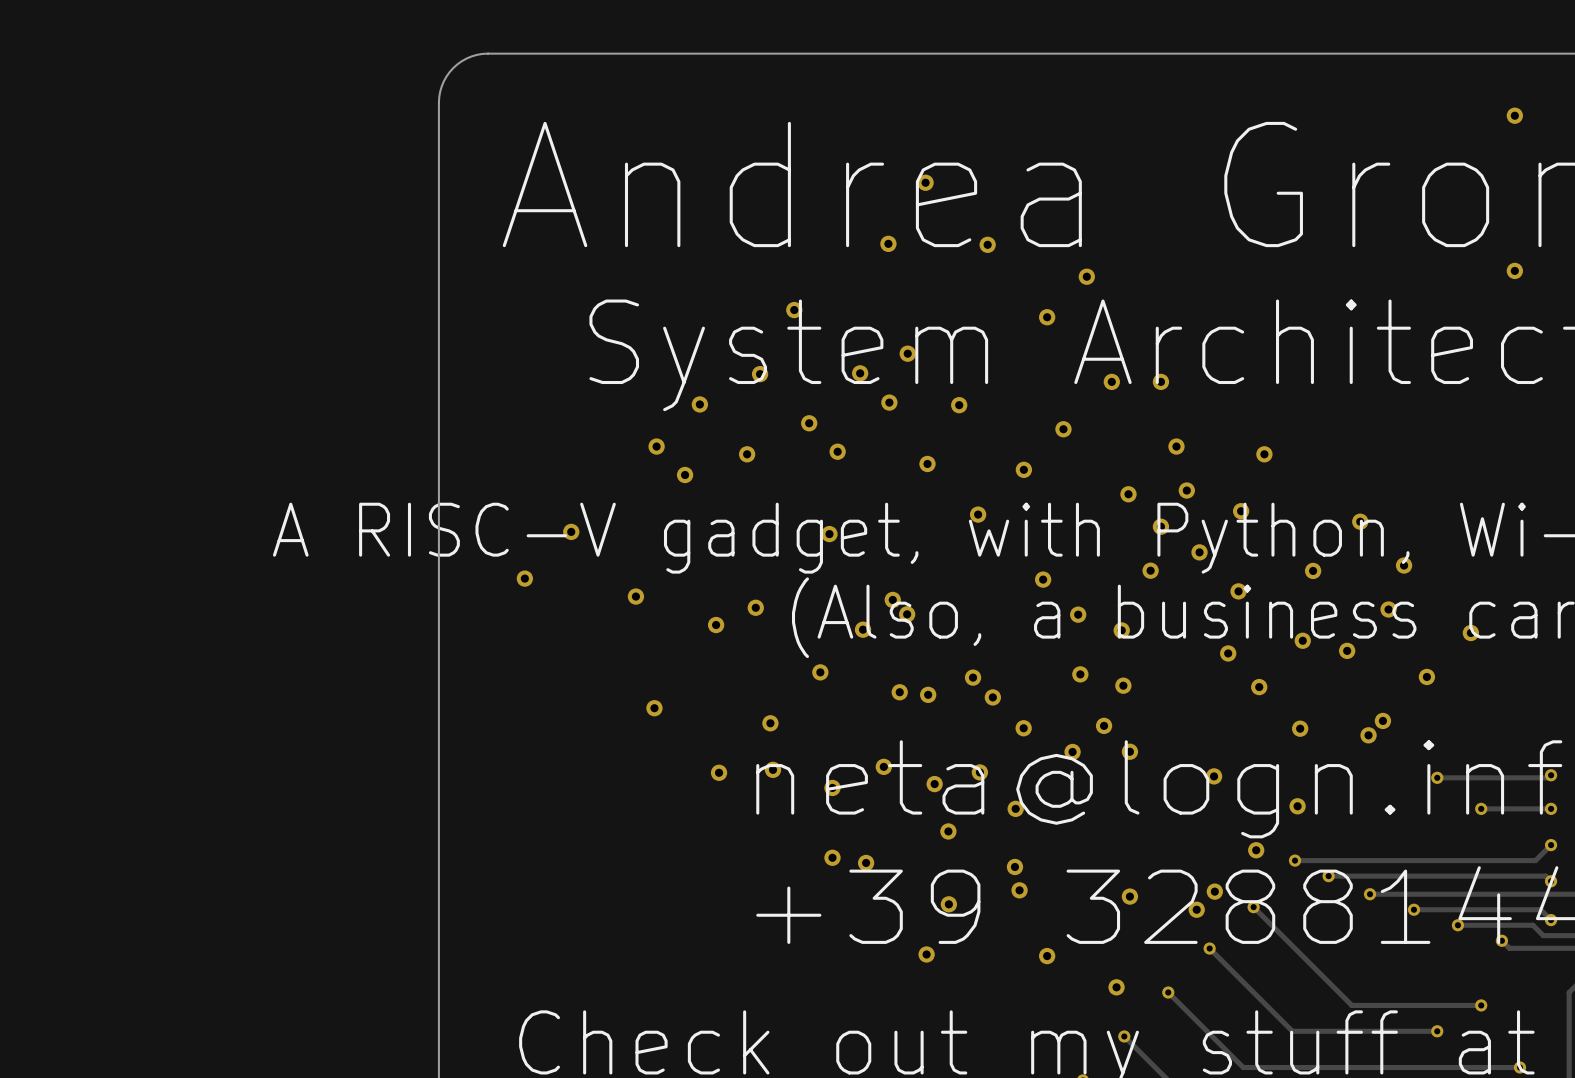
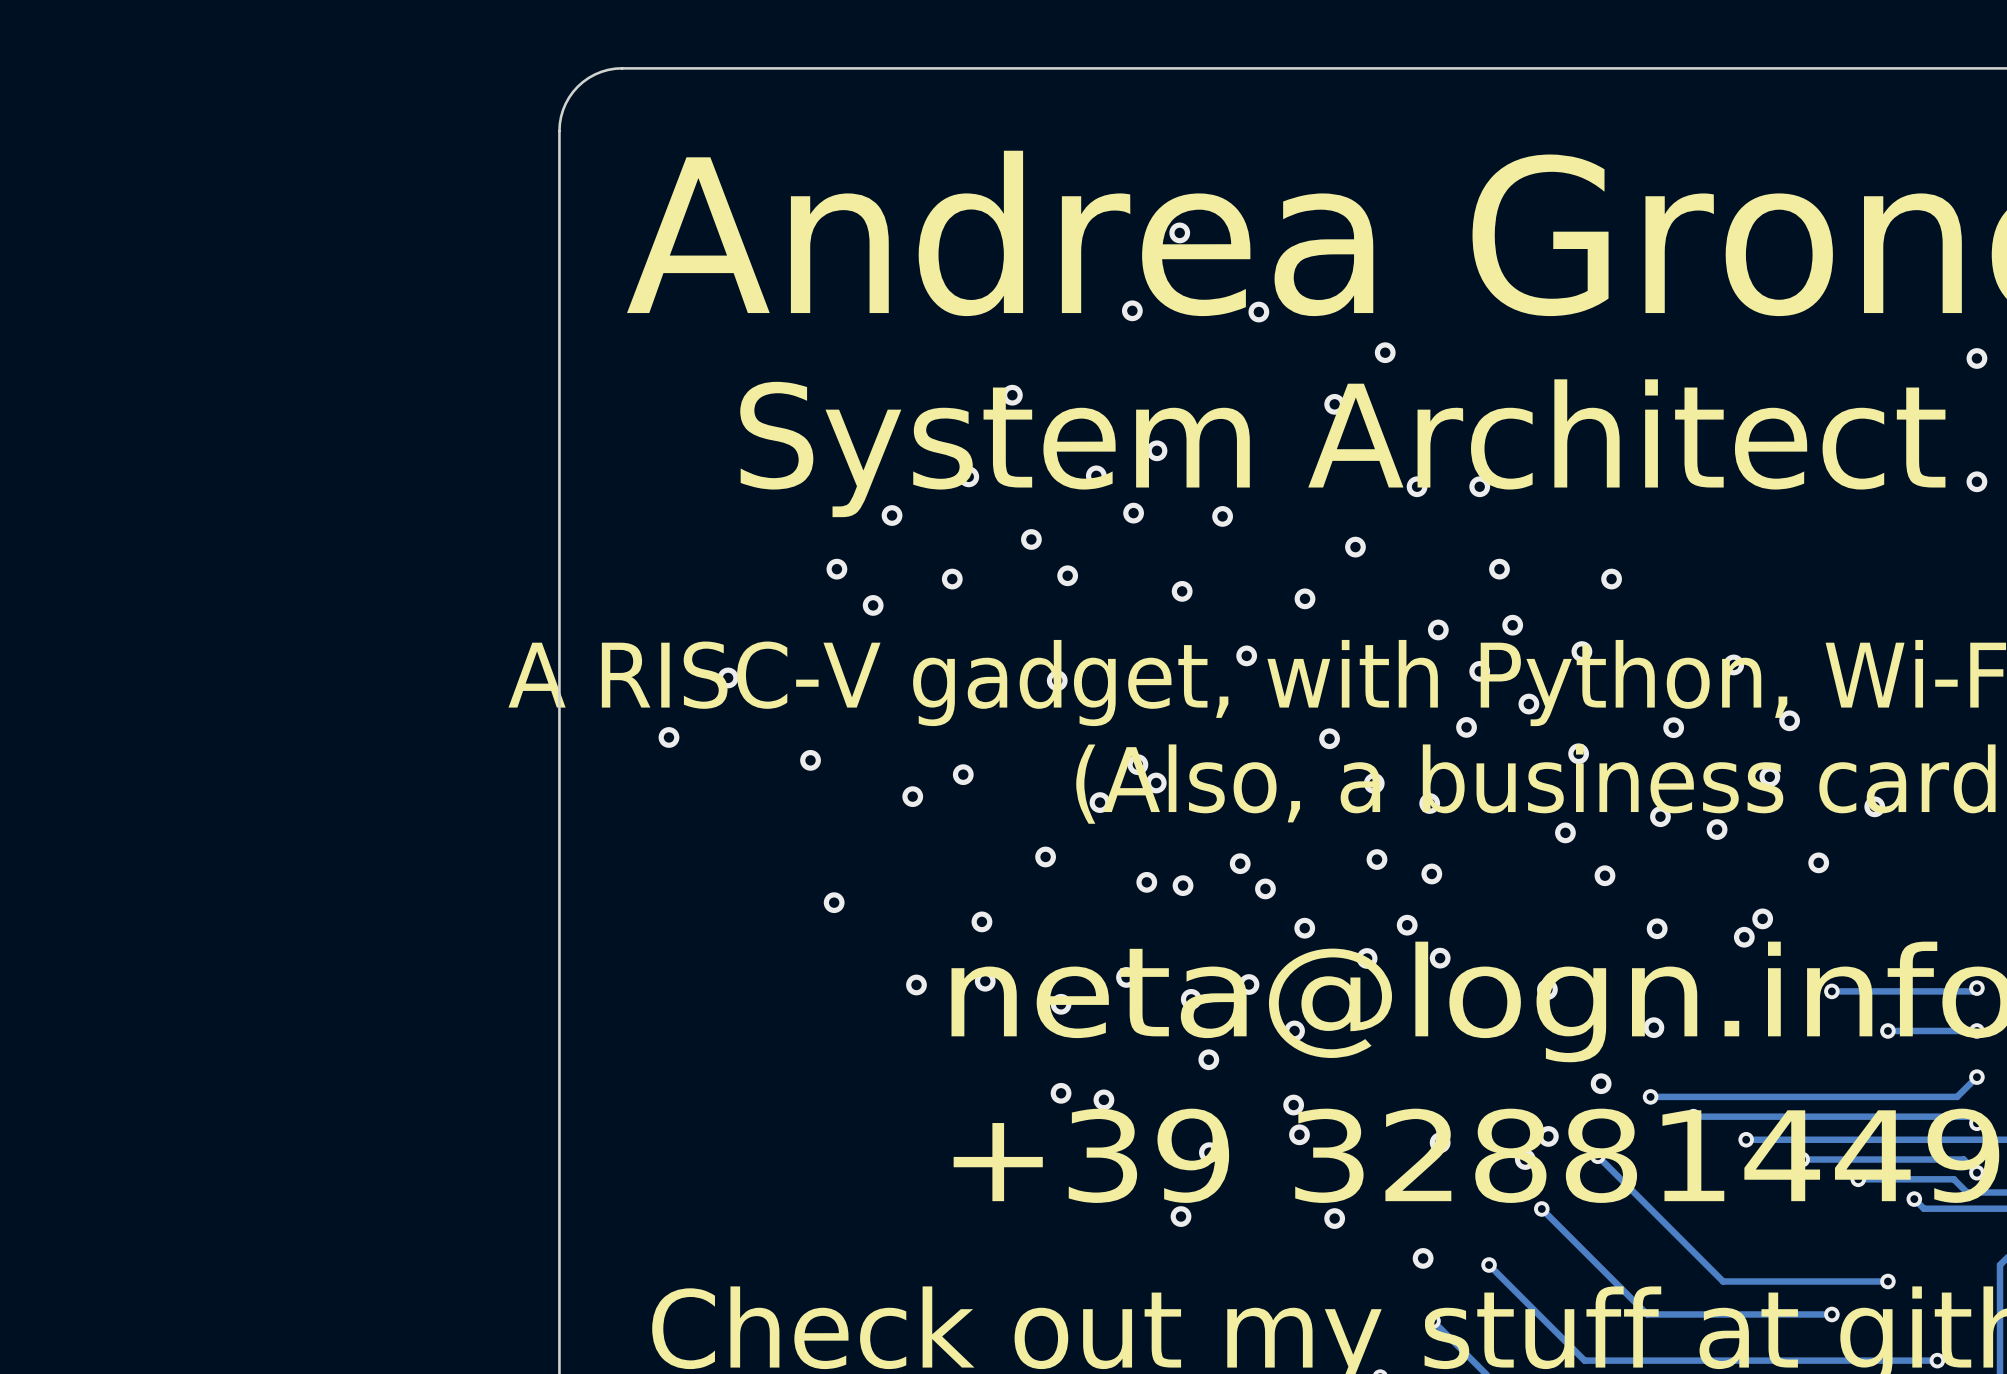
via: (1514, 115) -> none
via position: (1514, 270) -> (1976, 358)
via: none -> (1976, 481)

